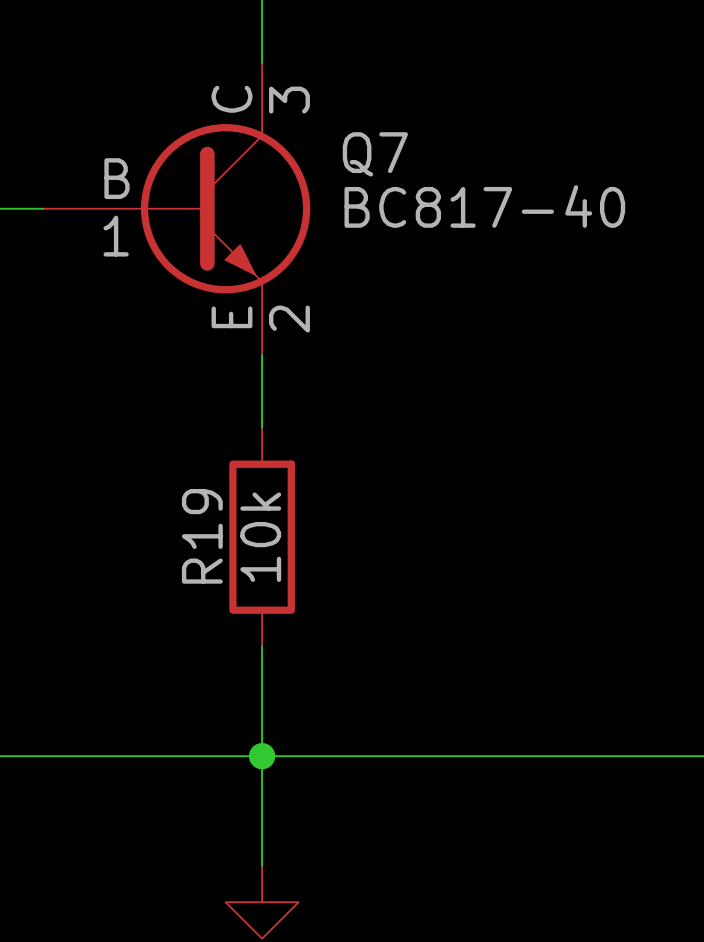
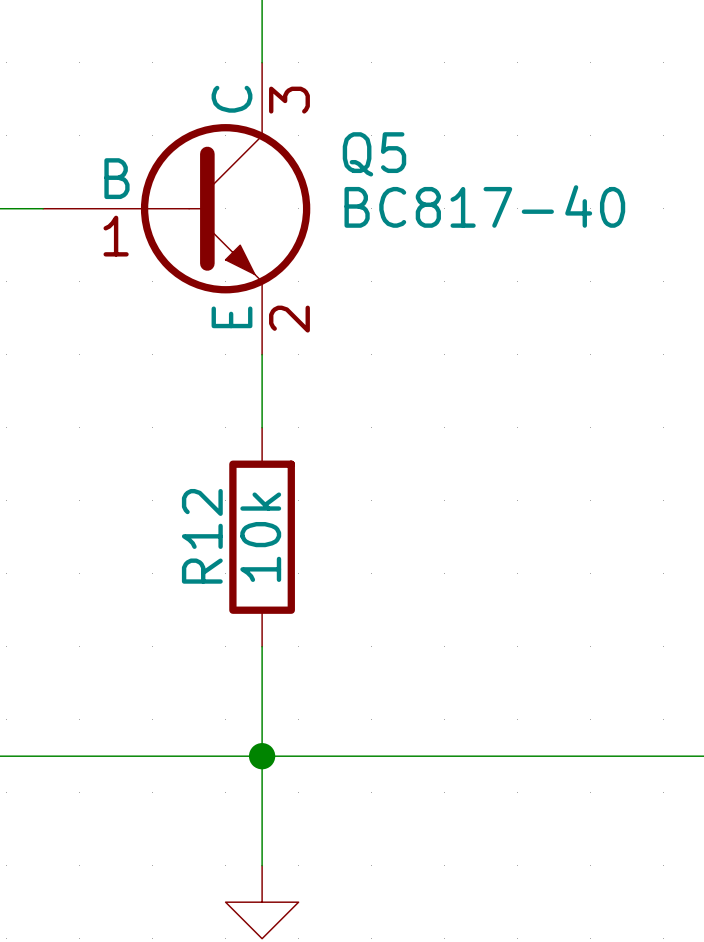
Q7 name: Q7 (375, 154) -> Q5 (374, 154)
R19 name: R19 (202, 536) -> R12 (202, 536)

